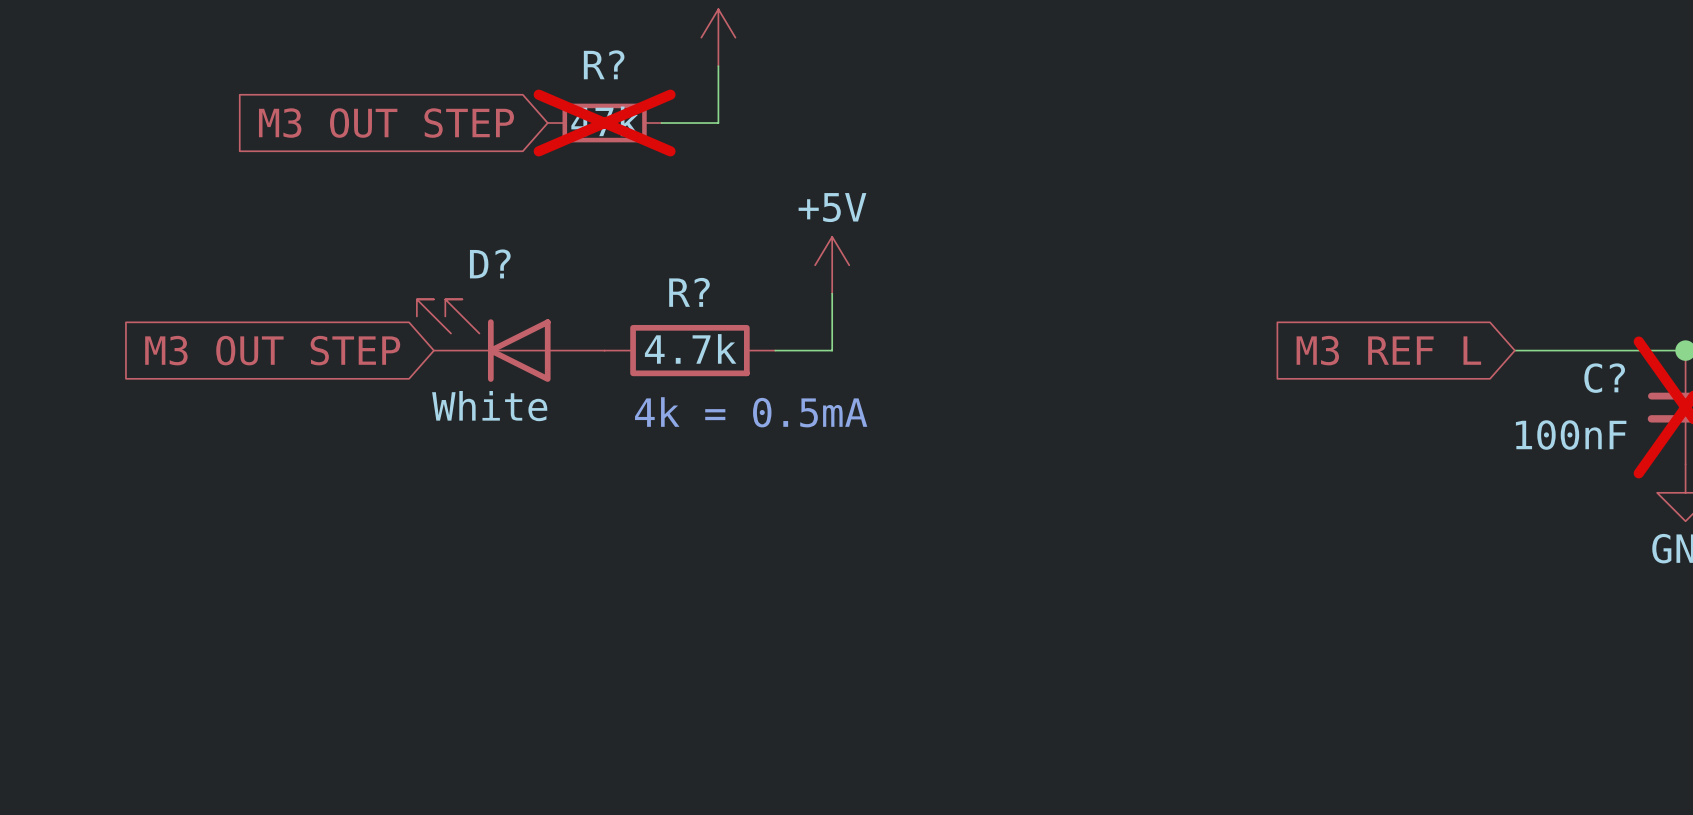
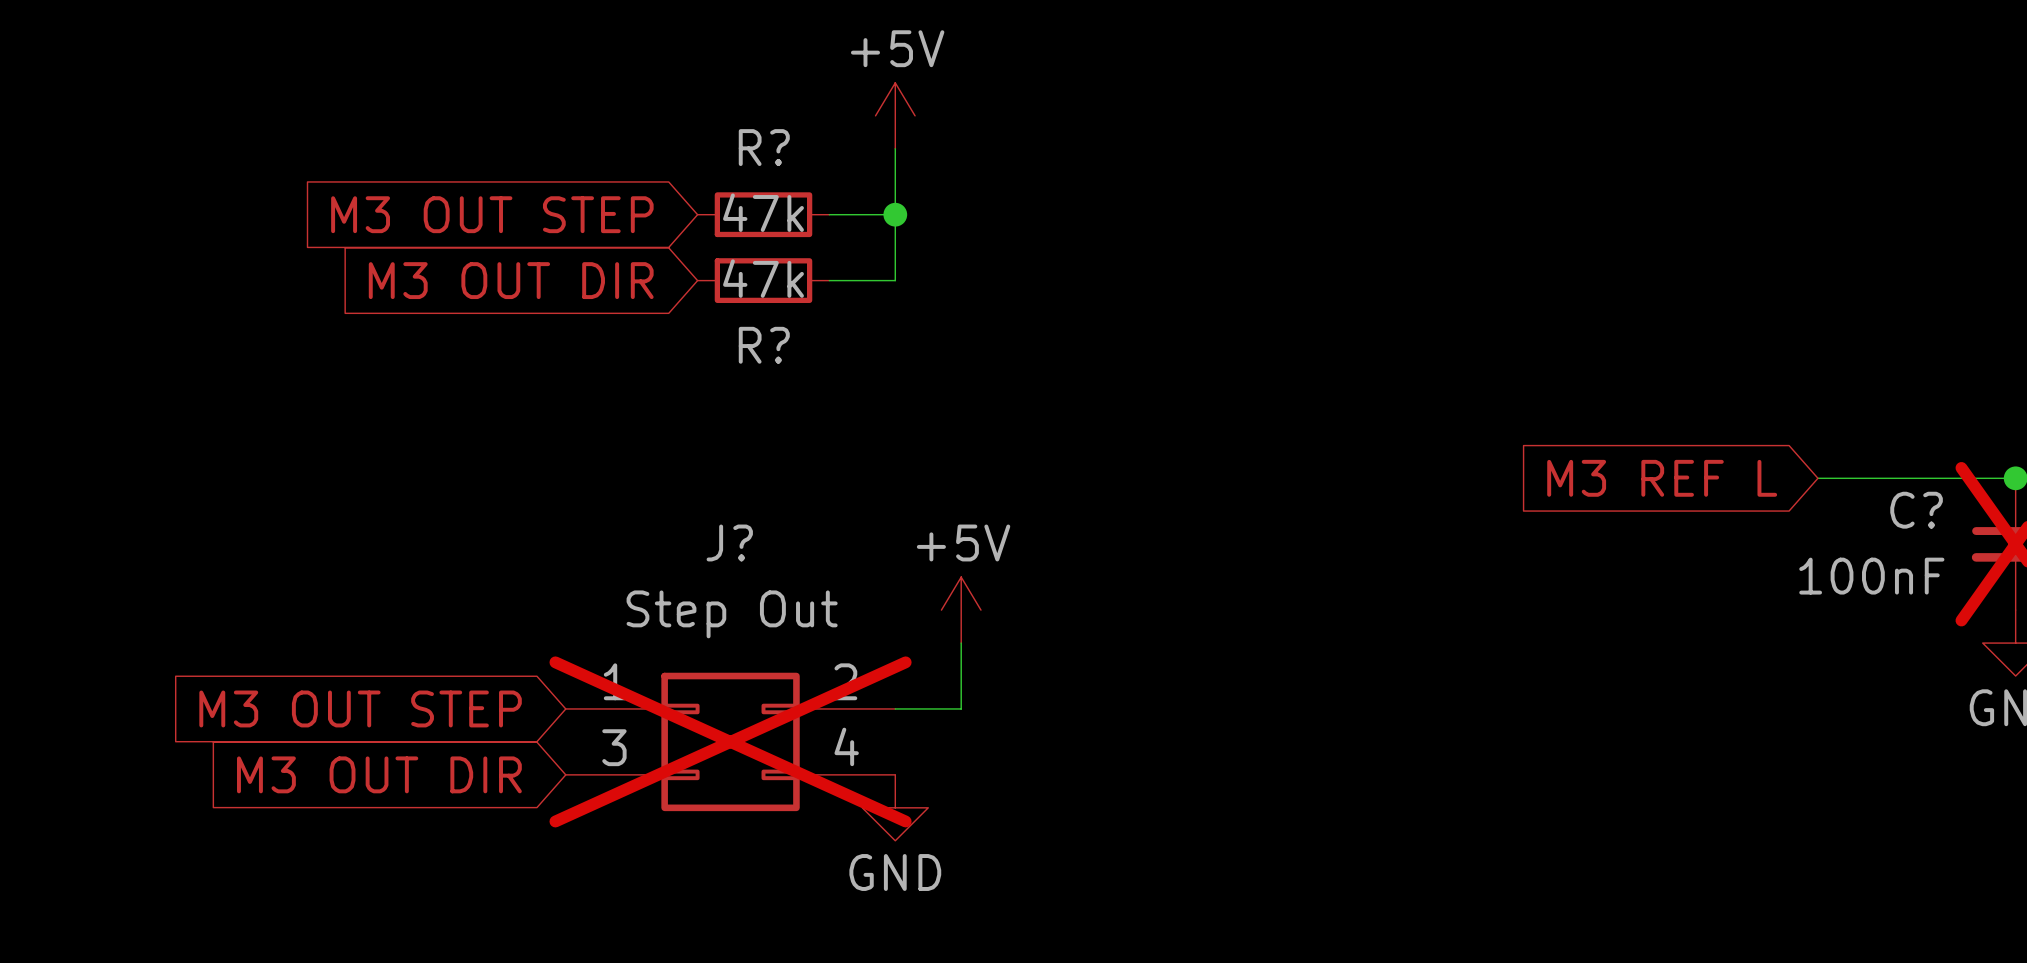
R? do-not-place cross: (604, 123) -> none
junction: none -> (895, 214)
global label: none -> M3 OUT DIR (511, 280)
R?: none -> 47k (763, 280)
power symbol position: +5V (832, 265) -> +5V (961, 610)
wire: (832, 293) (832, 350) (775, 350) -> (895, 214) (895, 280) (829, 280)
D?: White (510, 340) -> none
global label position: M3 OUT STEP (272, 350) -> M3 OUT STEP (360, 708)
R?: 4.7k (689, 350) -> none
text: 4k = 0.5mA (751, 412) -> none
wire: none -> (961, 643) (961, 708) (895, 708)
J?: none -> Step Out (730, 741)
global label: none -> M3 OUT DIR (379, 774)
power symbol: none -> GND (895, 807)

